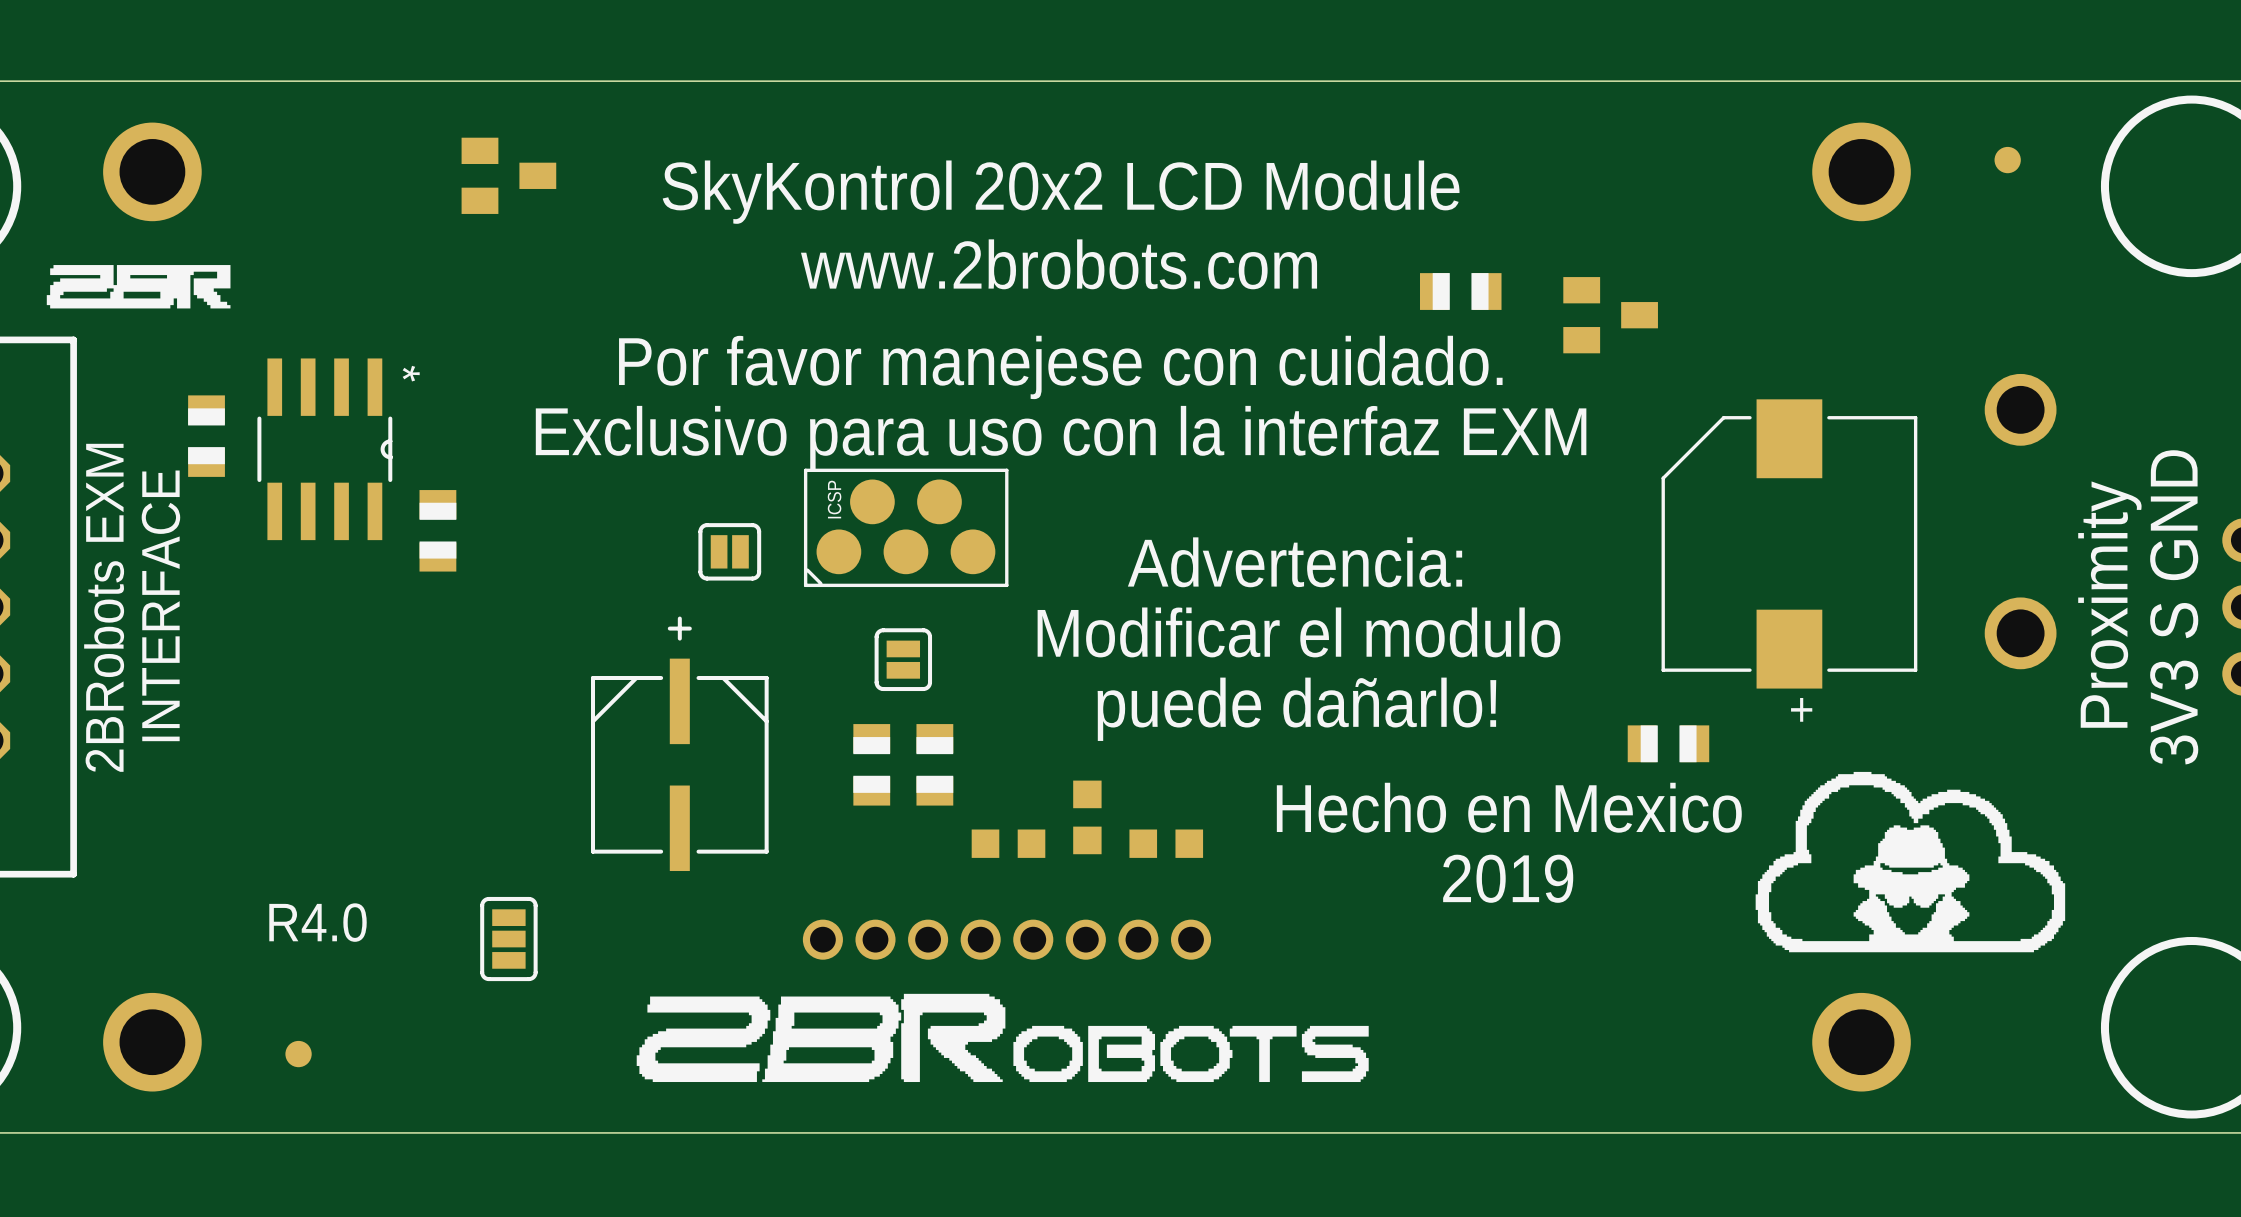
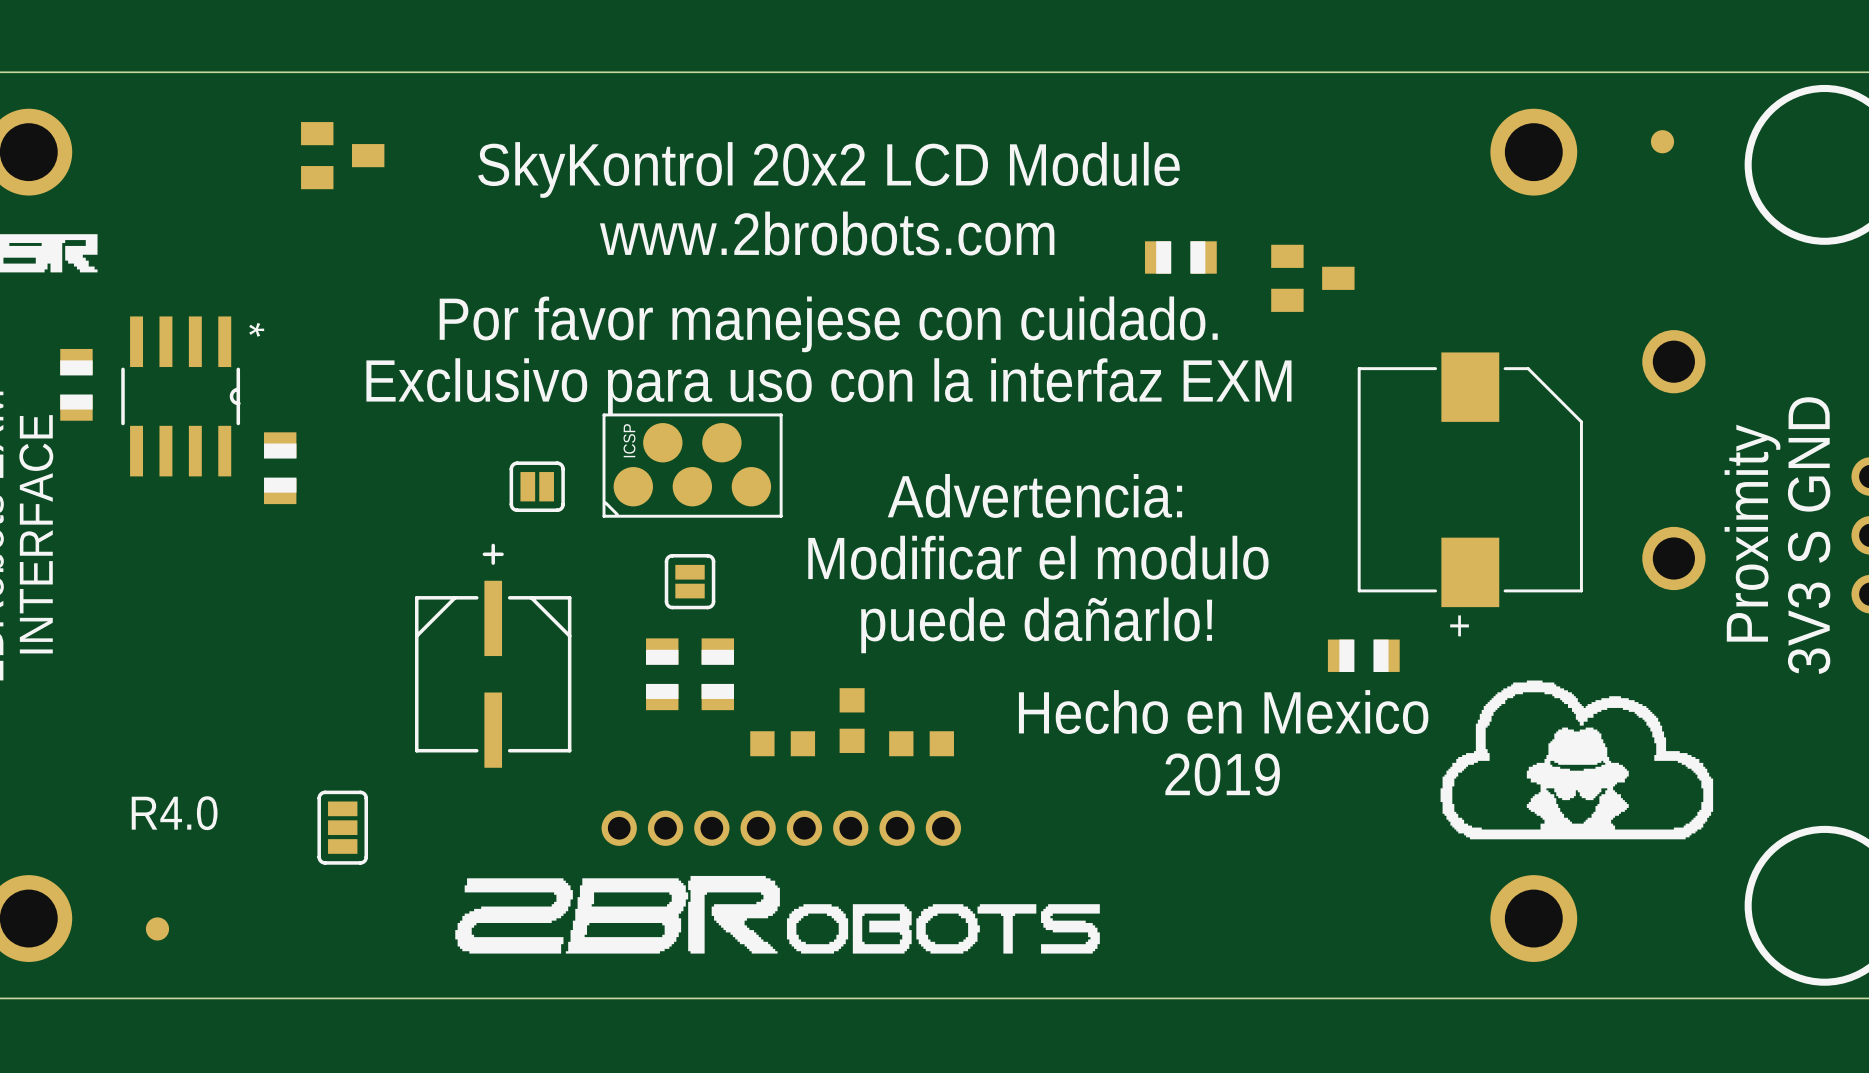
part footprint: [1661, 399, 1918, 689] -> [1357, 352, 1583, 608]

